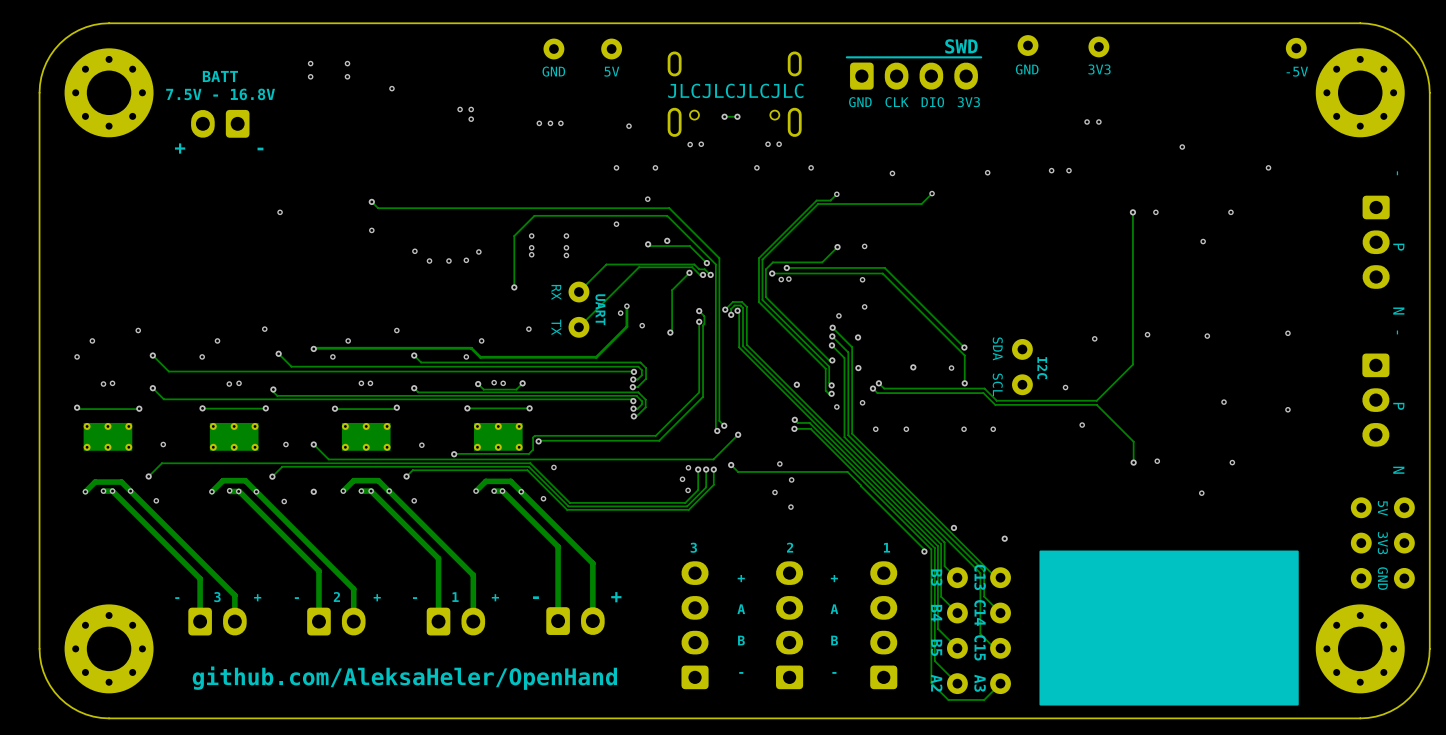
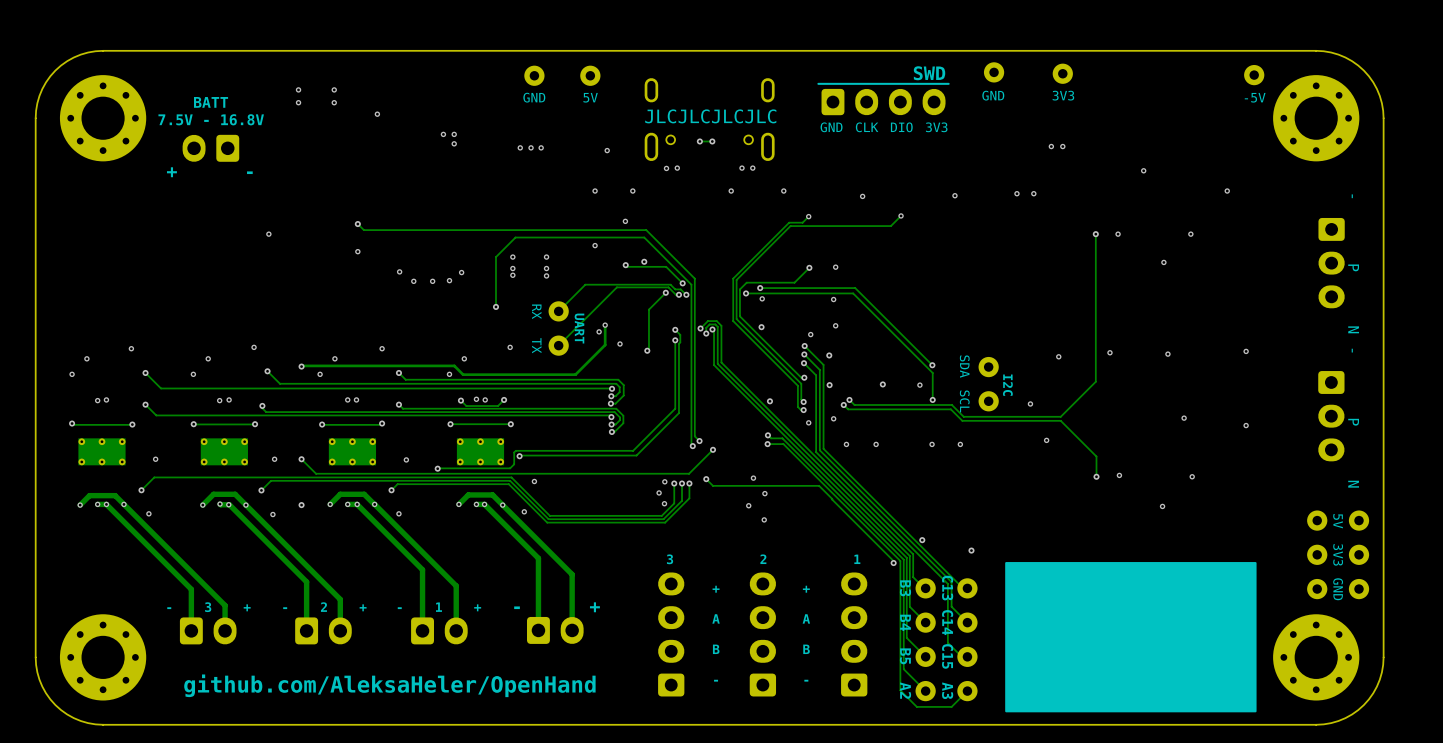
via: (781, 279) -> none
via: none -> (761, 327)

